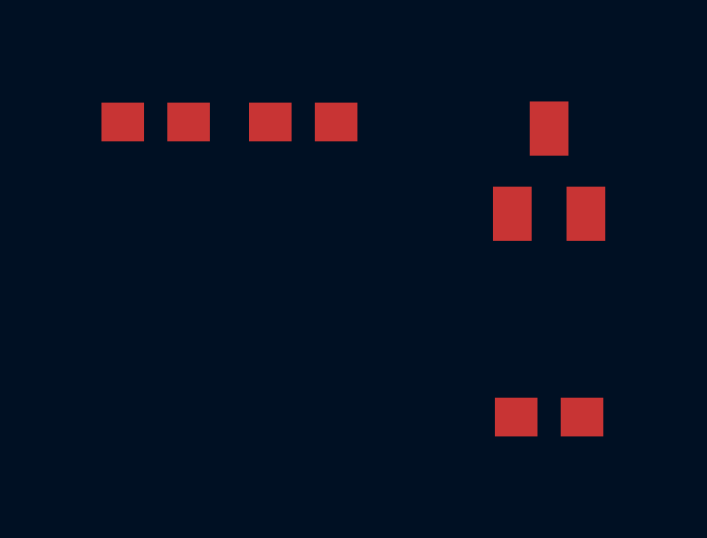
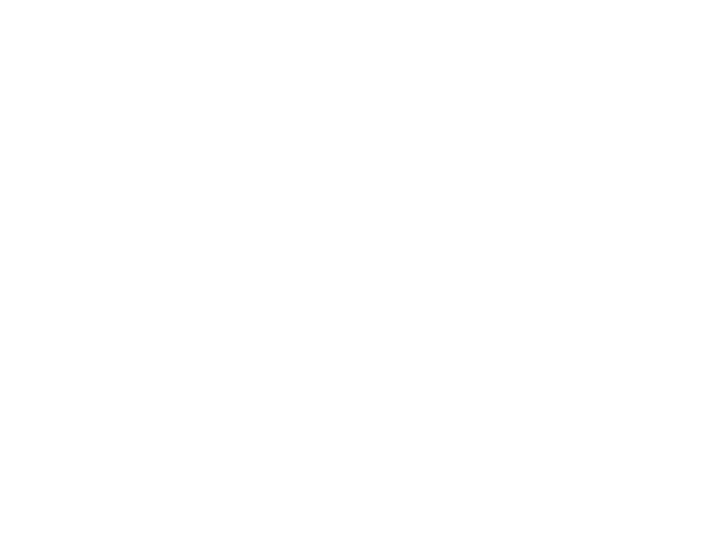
part: (155, 121) -> none
part: (303, 121) -> none
part: (549, 171) -> none
part: (549, 417) -> none

